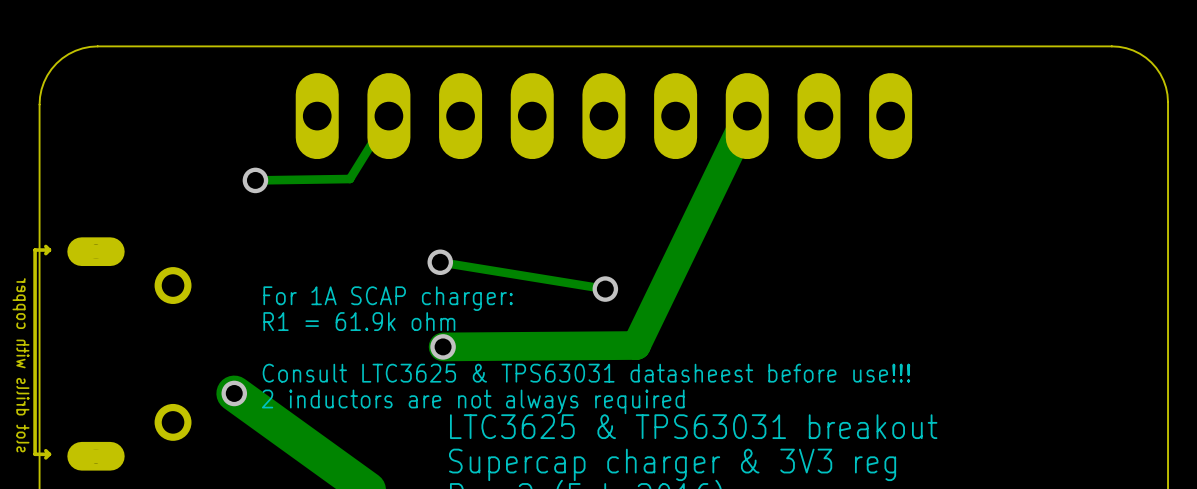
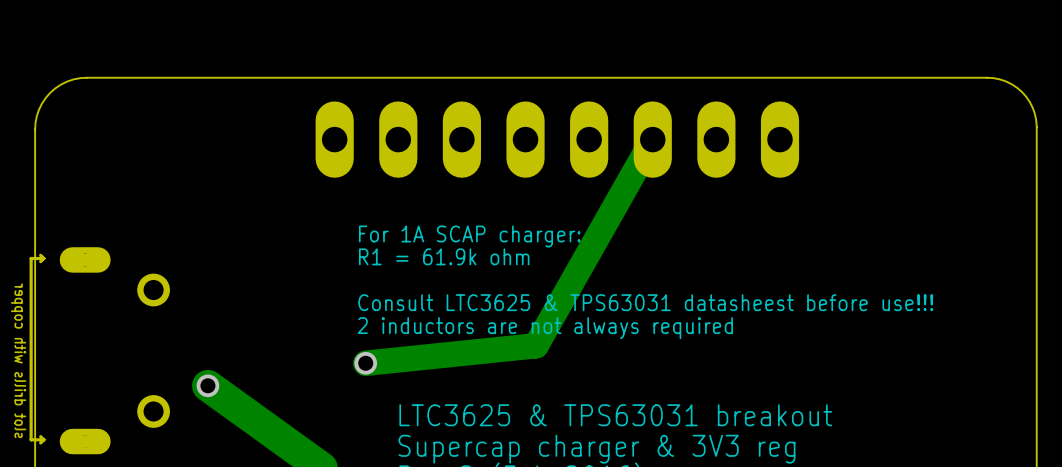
part footprint: [295, 73, 913, 160] -> [315, 101, 800, 178]
track: (388, 116) (349, 179) (255, 180) -> none
track: none -> (652, 139) (536, 345) (365, 363)
track: (747, 116) (636, 345) (443, 346) -> none
via: (255, 180) -> none
track: (440, 262) (605, 289) -> none
via: (440, 262) -> none
via: (605, 289) -> none
text position: For 1A SCAP charger: (388, 298) -> For 1A SCAP charger: (469, 236)
text position: R1 = 61.9k ohm (359, 321) -> R1 = 61.9k ohm (444, 256)
via position: (443, 346) -> (365, 363)
text position: Consult LTC3625 & TPS63031 datasheest before use!!! (586, 373) -> Consult LTC3625 & TPS63031 datasheest before use!!! (645, 302)
text position: 2 inductors are not always required (473, 401) -> 2 inductors are not always required (545, 328)

